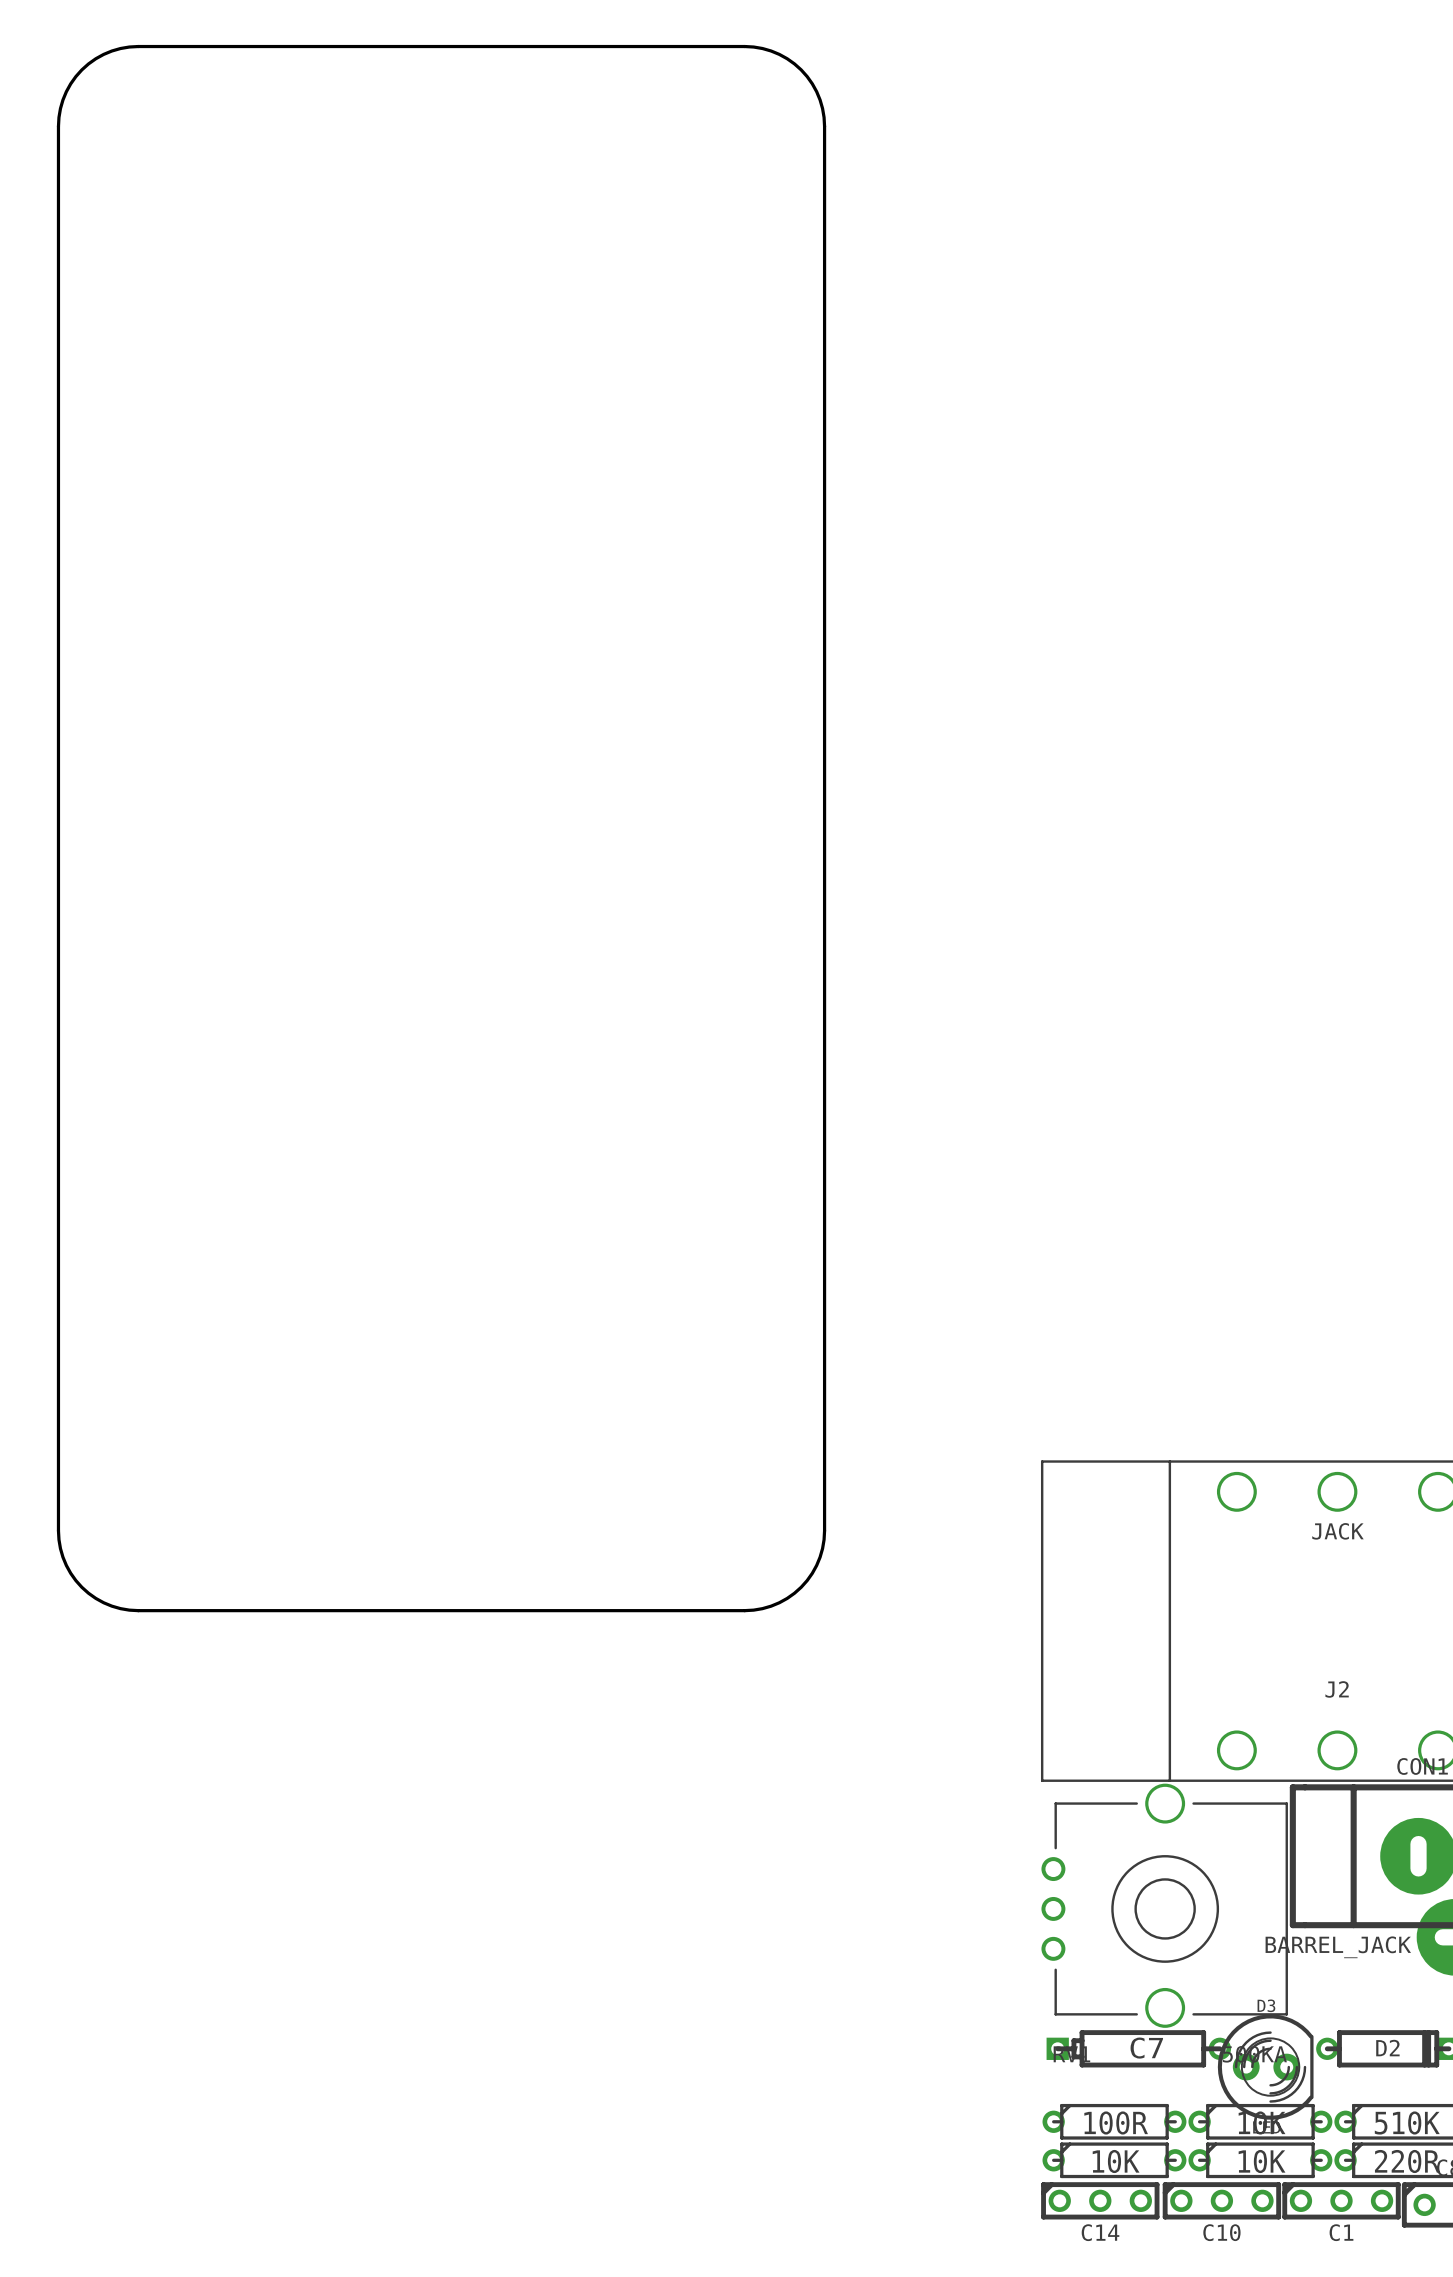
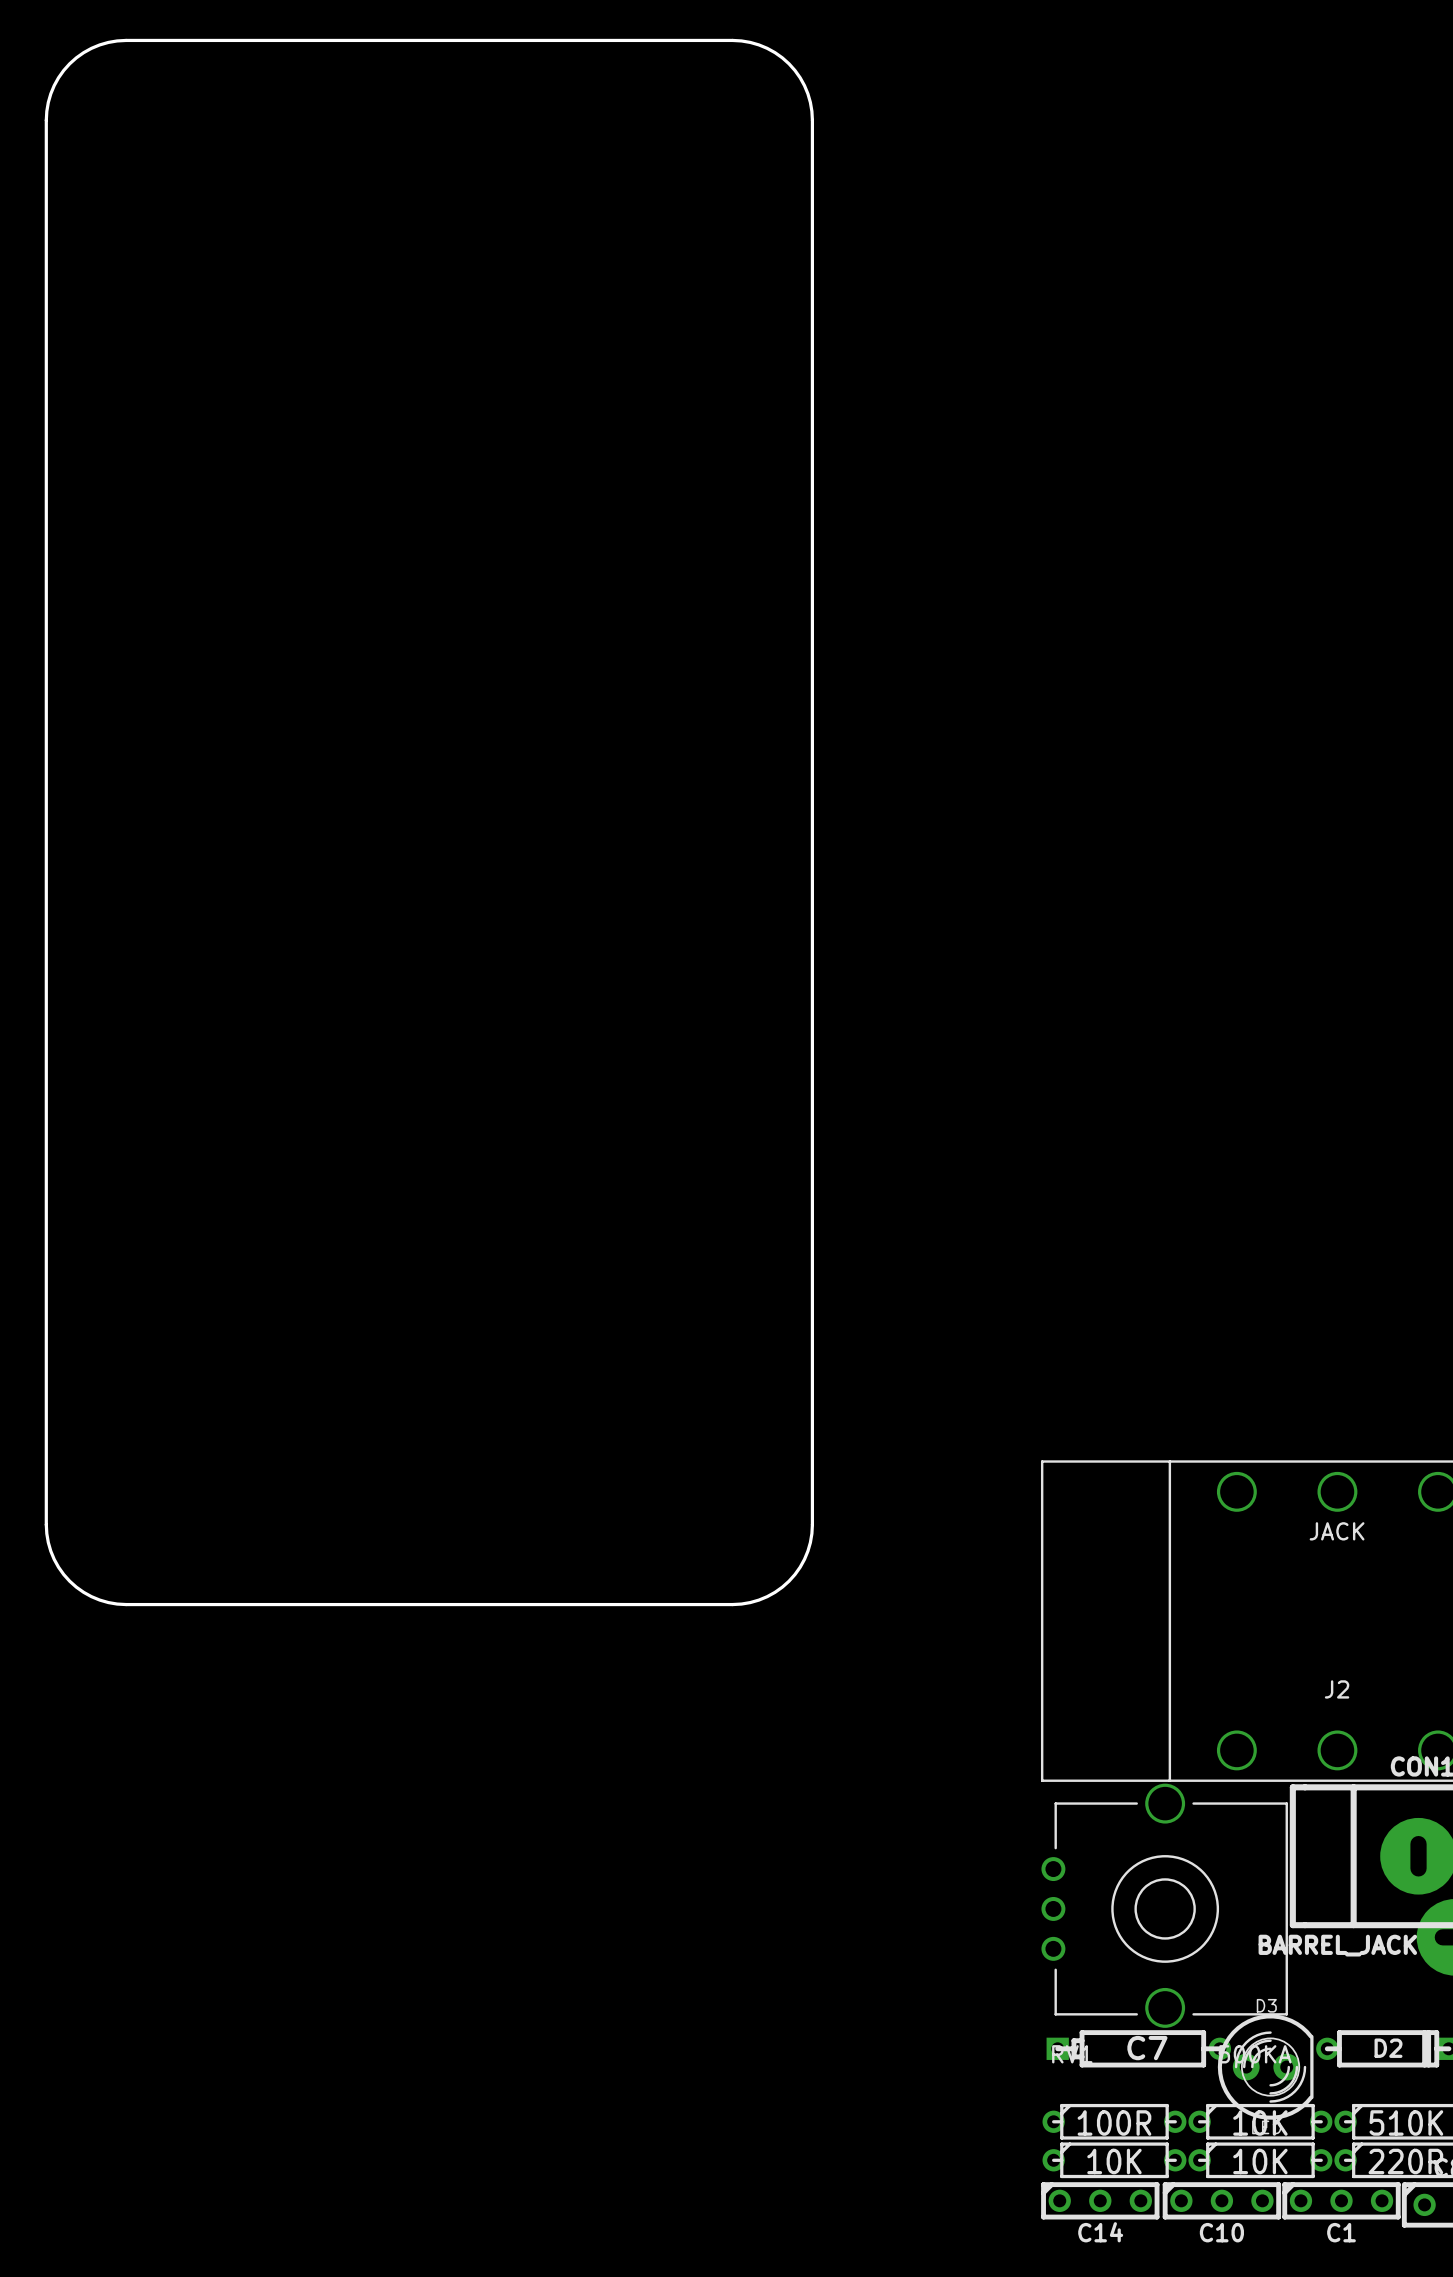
board edge: (138, 46) (753, 47) (779, 54) (794, 63) (807, 76) (820, 99) (824, 126) (824, 1530) (820, 1557) (807, 1580) (794, 1593) (771, 1606) (744, 1610) (129, 1610) (103, 1602) (88, 1593) (75, 1580) (62, 1557) (58, 1530) (58, 126) (60, 108) (66, 91) (81, 69) (103, 54) (120, 48) (138, 46) -> (126, 40) (741, 40) (758, 44) (782, 57) (795, 70) (807, 93) (812, 120) (812, 1524) (807, 1551) (795, 1574) (782, 1587) (758, 1600) (732, 1604) (117, 1604) (99, 1600) (76, 1587) (63, 1574) (50, 1551) (46, 1524) (46, 120) (50, 93) (58, 77) (69, 63) (83, 52) (99, 44) (126, 40)

